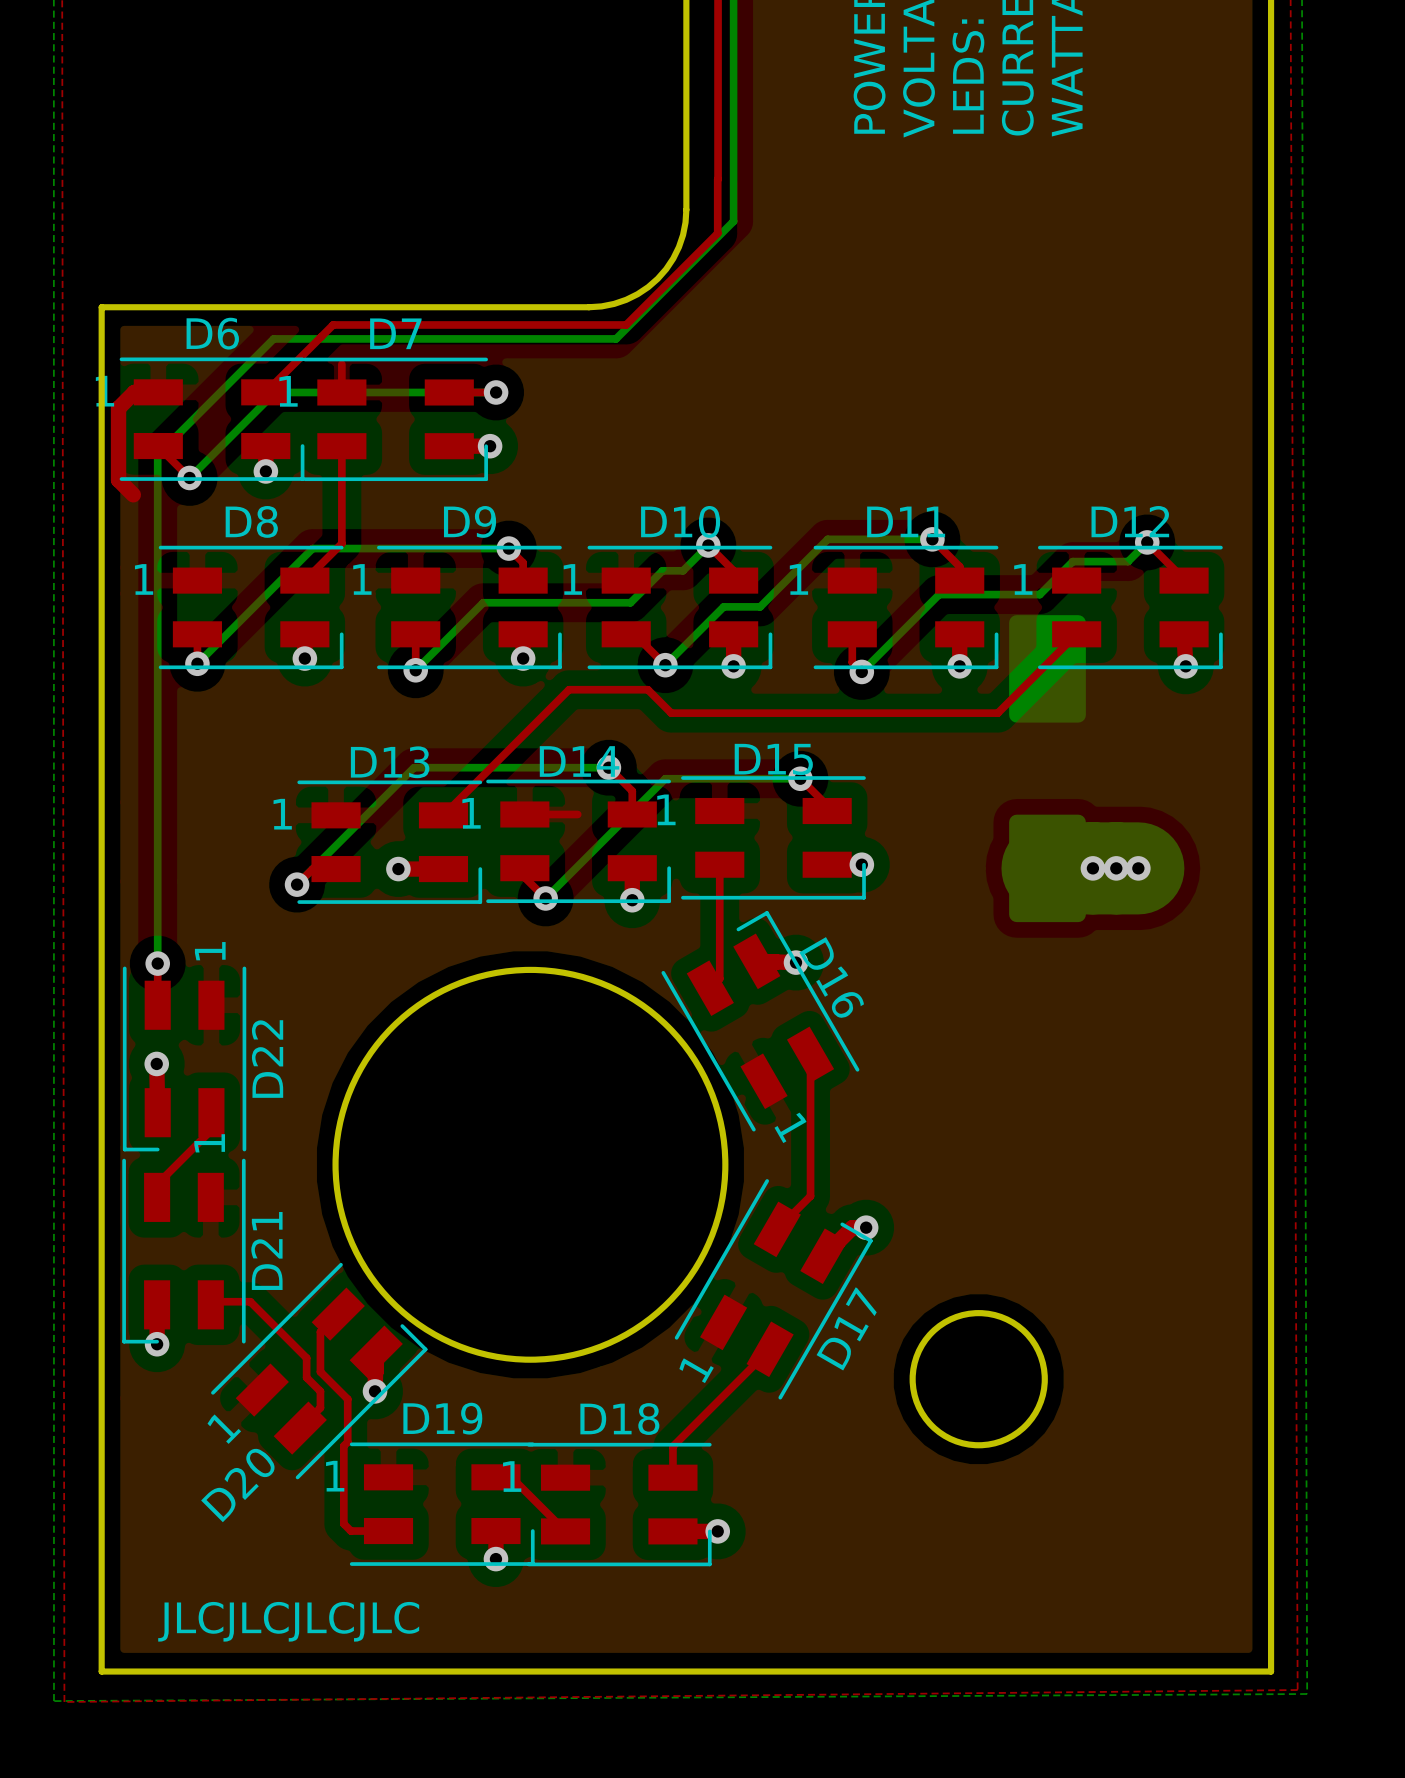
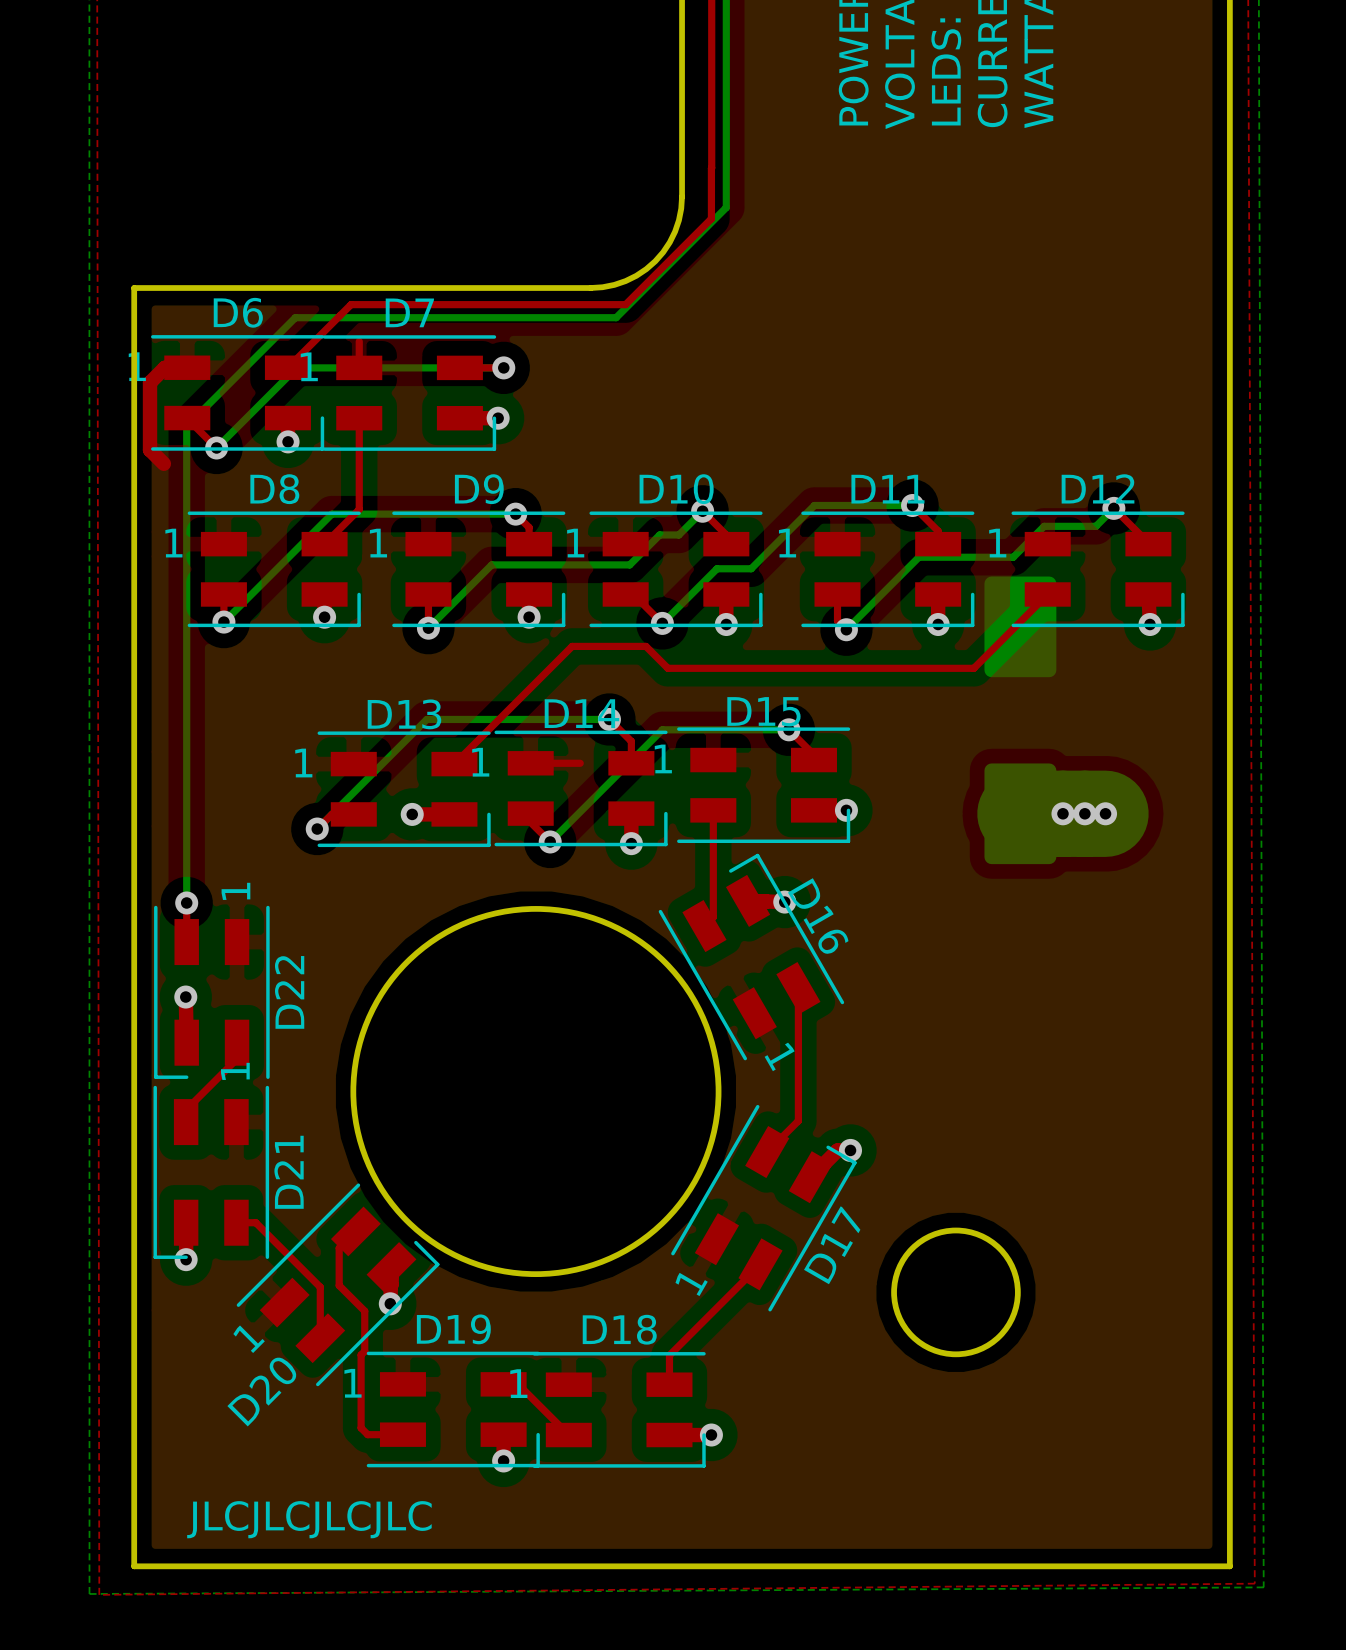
top track: (210, 1304) (213, 1301) (250, 1301) (306, 1358) (306, 1377) (320, 1391) (320, 1407) (300, 1428) -> (236, 1222) (255, 1222) (320, 1287) (320, 1338)

